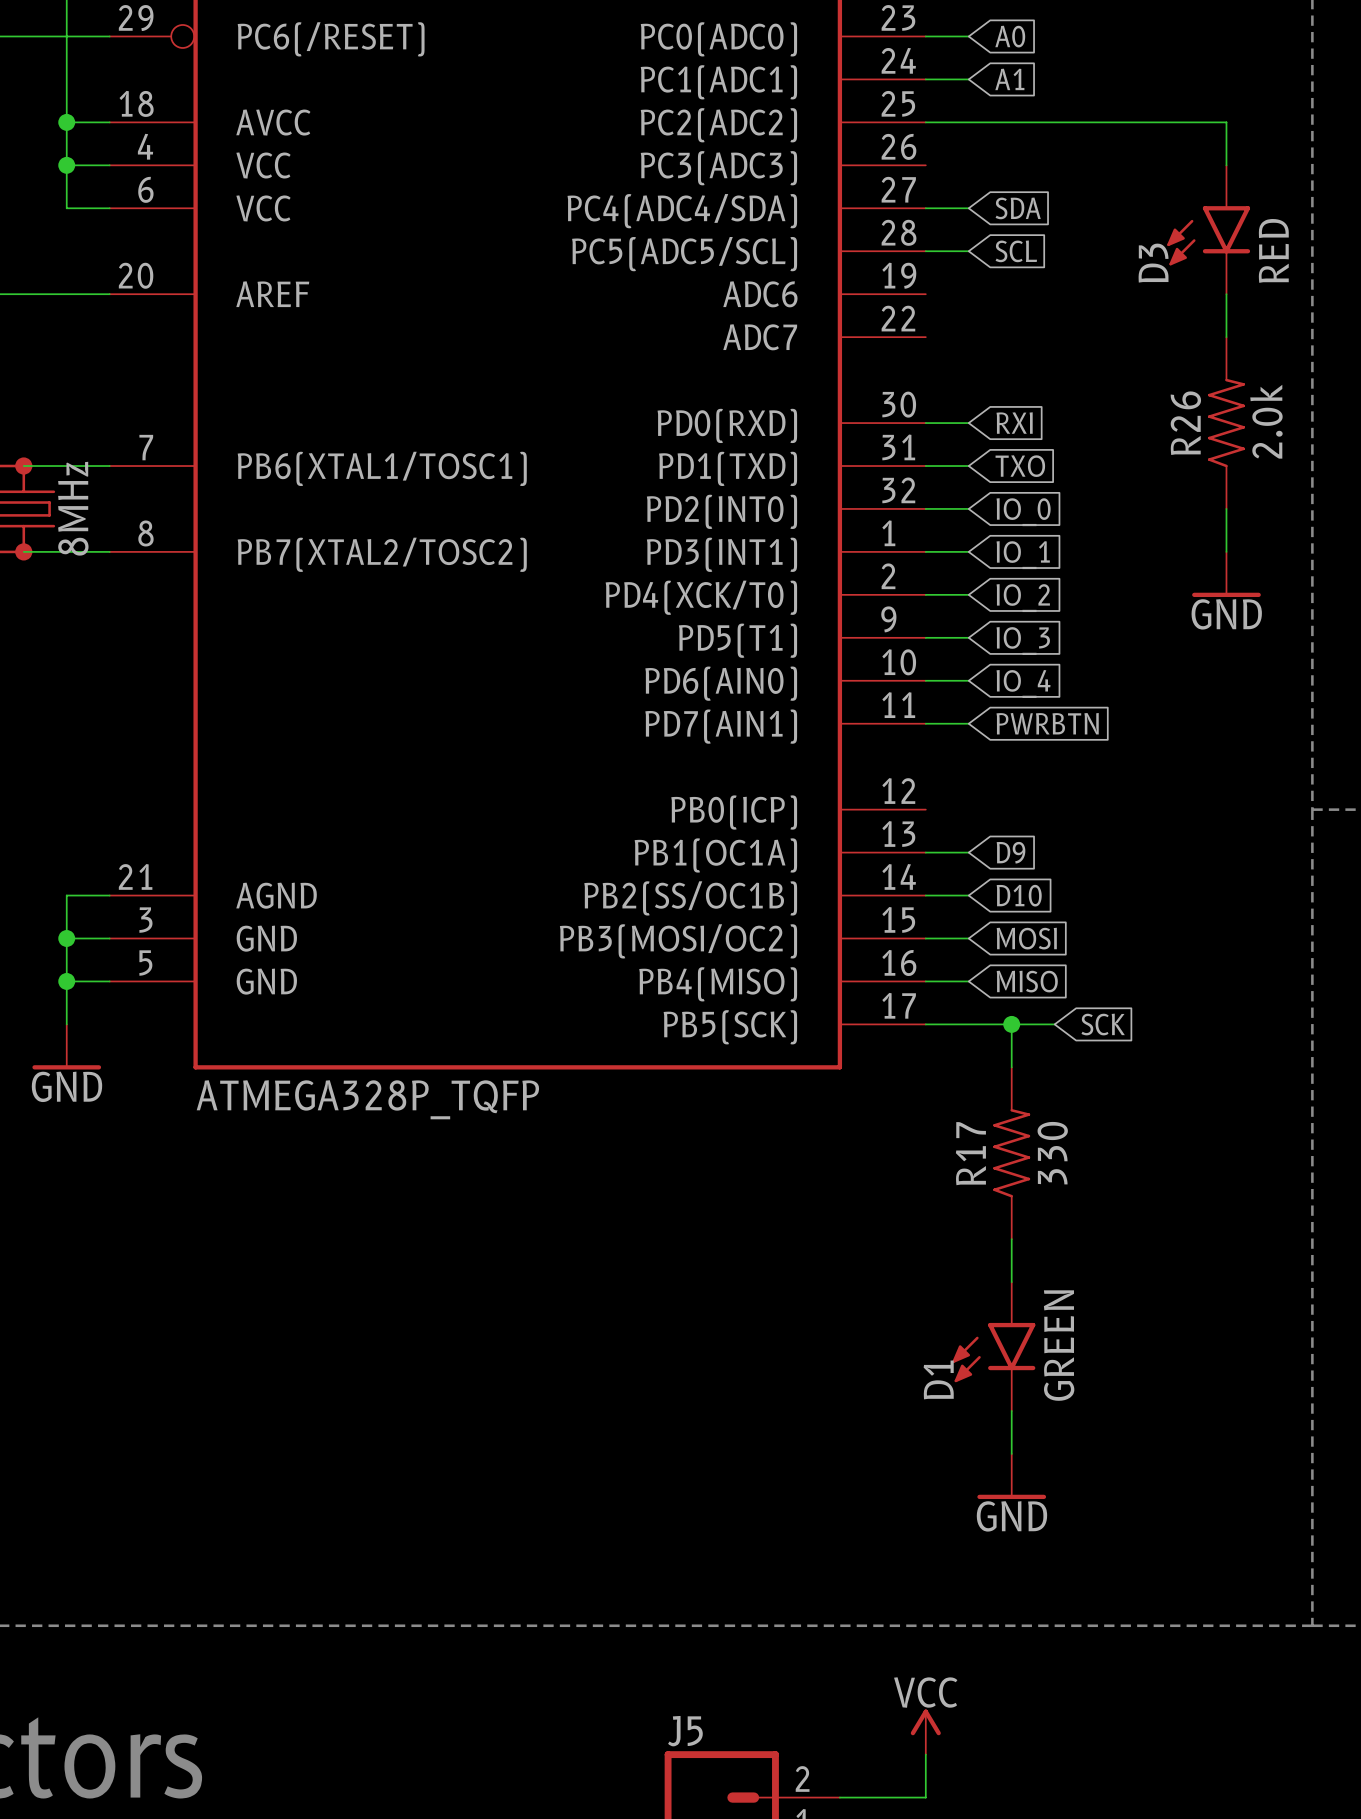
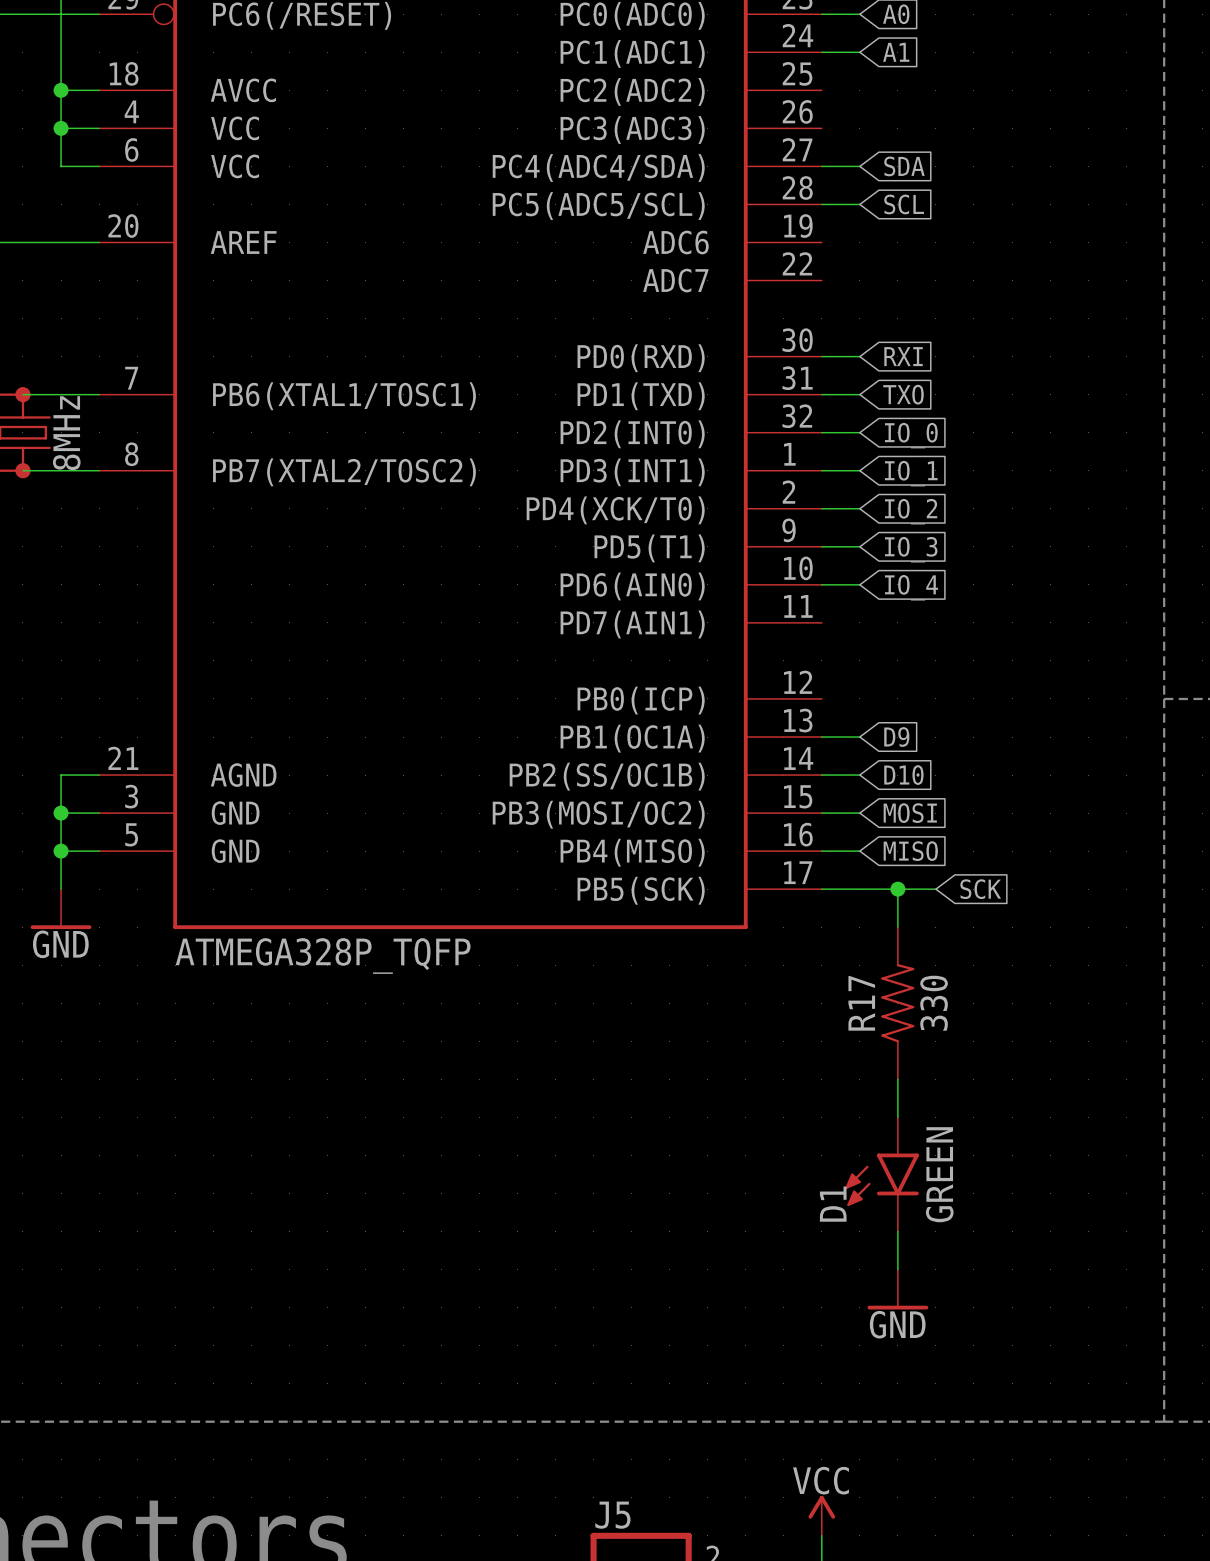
wire: (925, 122) (1226, 122) (1226, 165) -> none
D3: RED (1208, 229) -> none
wire: (1226, 294) (1226, 337) -> none
R26: 2.0k (1226, 423) -> none
wire: (1226, 508) (1226, 551) -> none
power symbol: GND (1226, 574) -> none
wire: (925, 723) (968, 723) -> none
global label: PWRBTN (1047, 723) -> none

